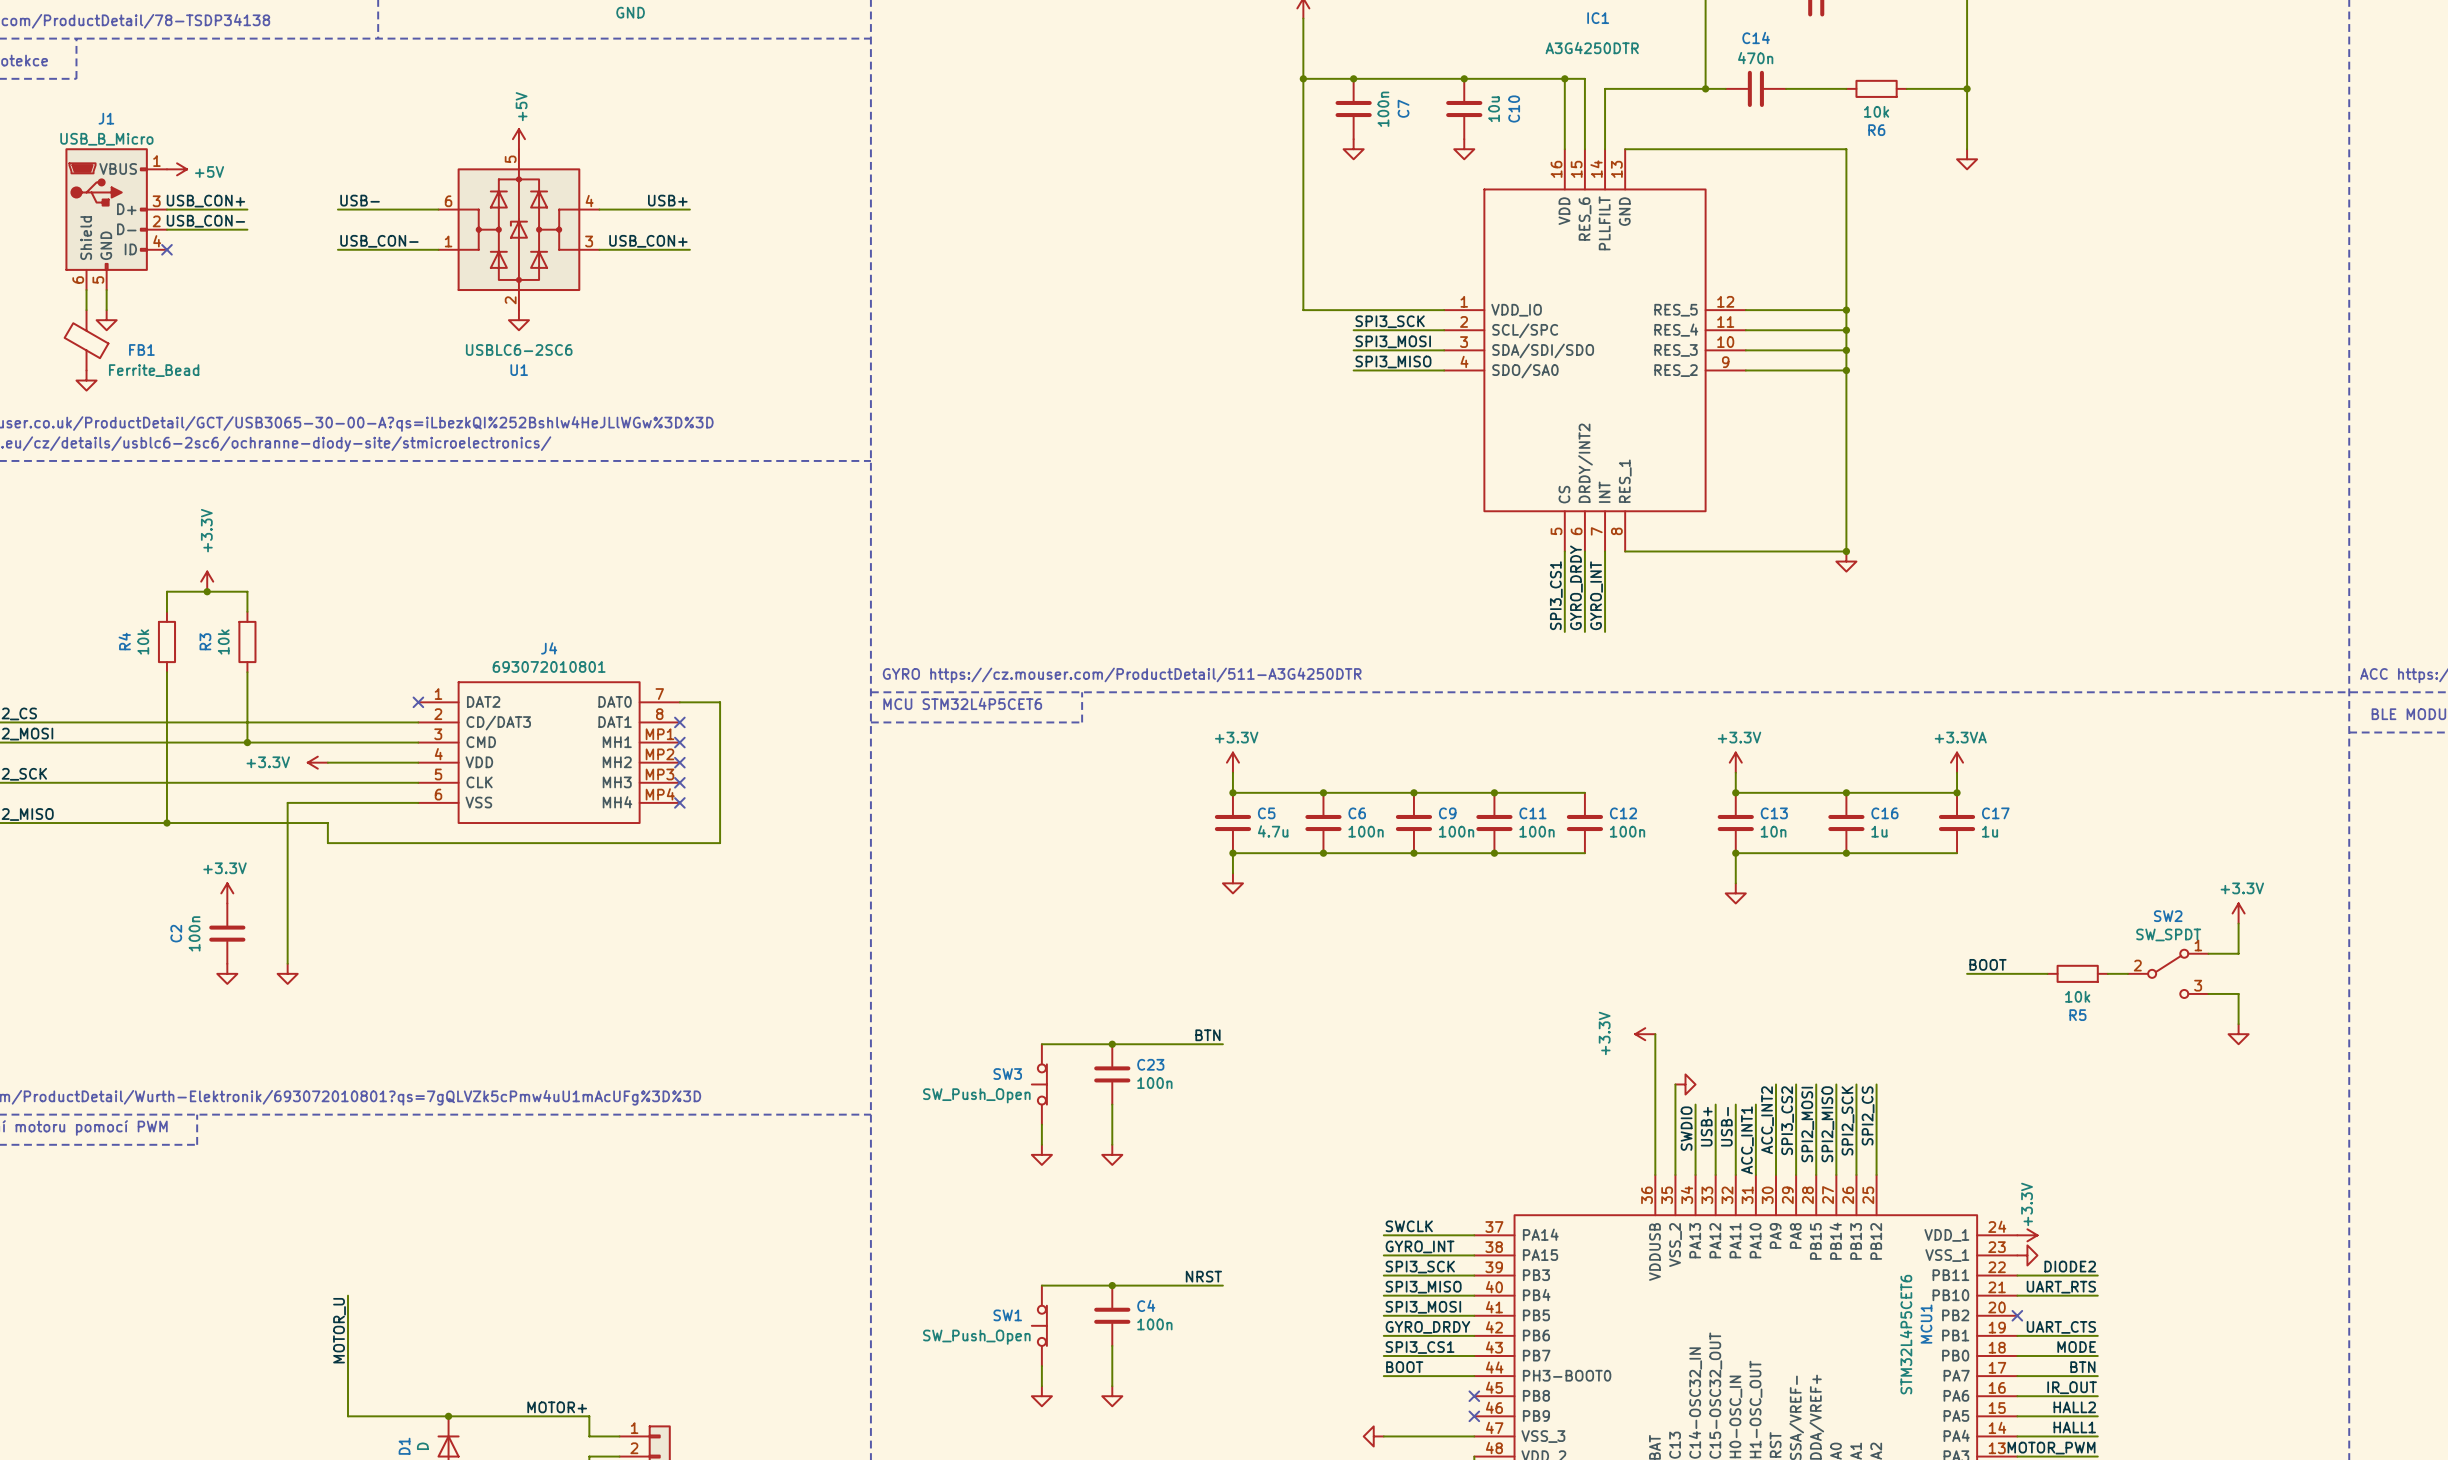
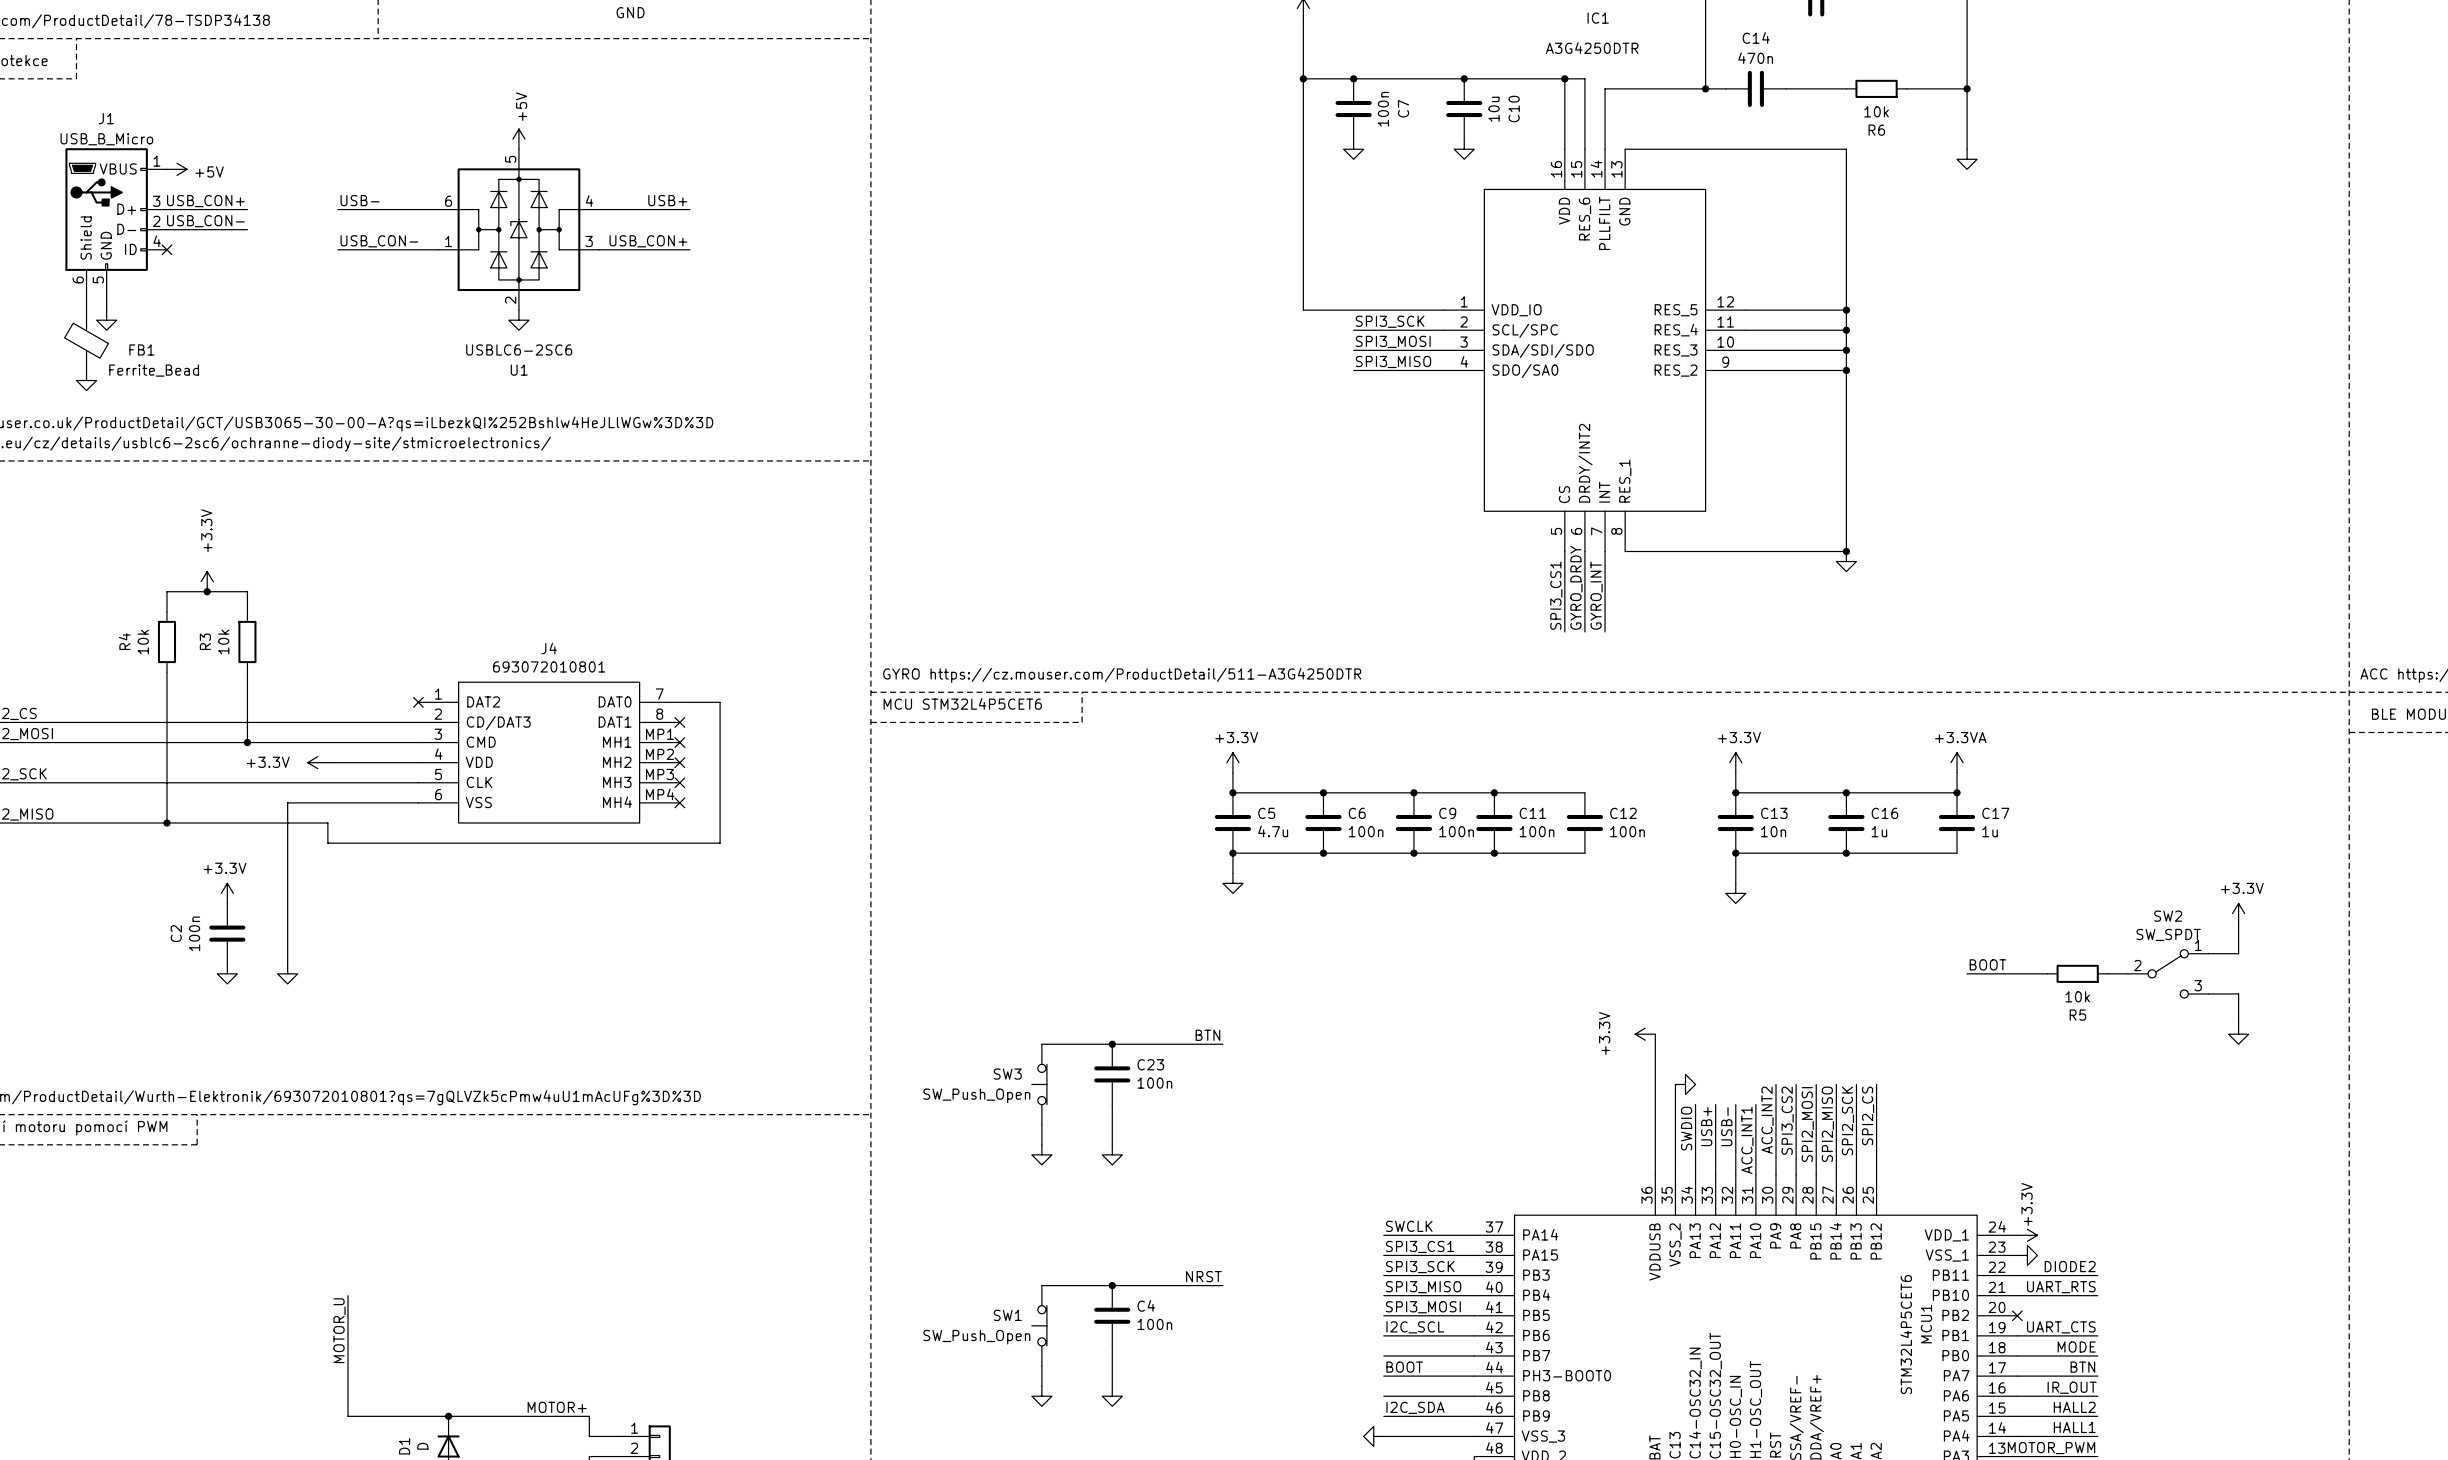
label: GYRO_INT (1420, 1246) -> SPI3_CS1 (1420, 1246)
label: GYRO_DRDY (1427, 1327) -> I2C_SCL (1415, 1327)
label: SPI3_CS1 (1420, 1347) -> none
wire: none -> (1383, 1396) (1474, 1396)
no-connect mark: (1474, 1396) -> none
label: none -> I2C_SDA (1415, 1407)
wire: none -> (1383, 1416) (1474, 1416)
no-connect mark: (1474, 1416) -> none

